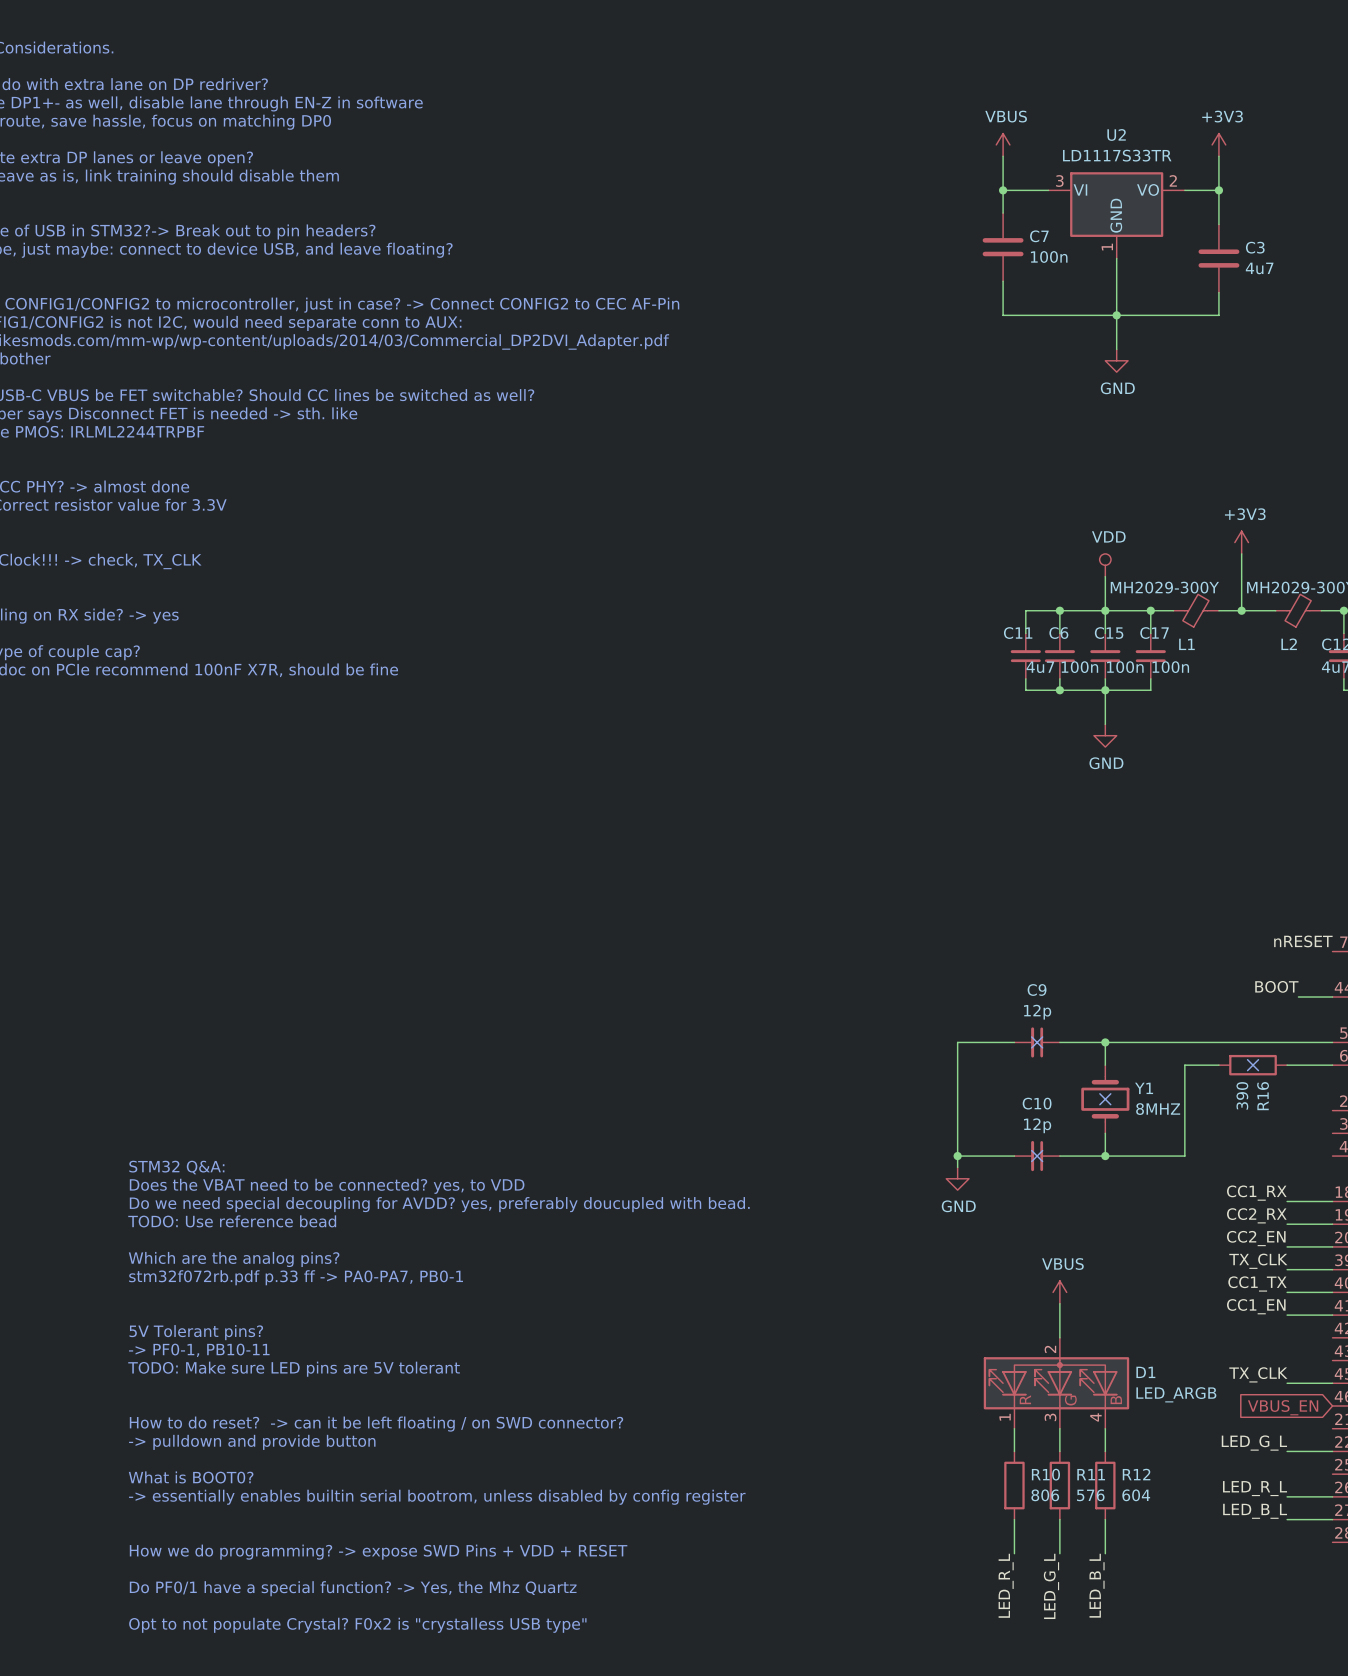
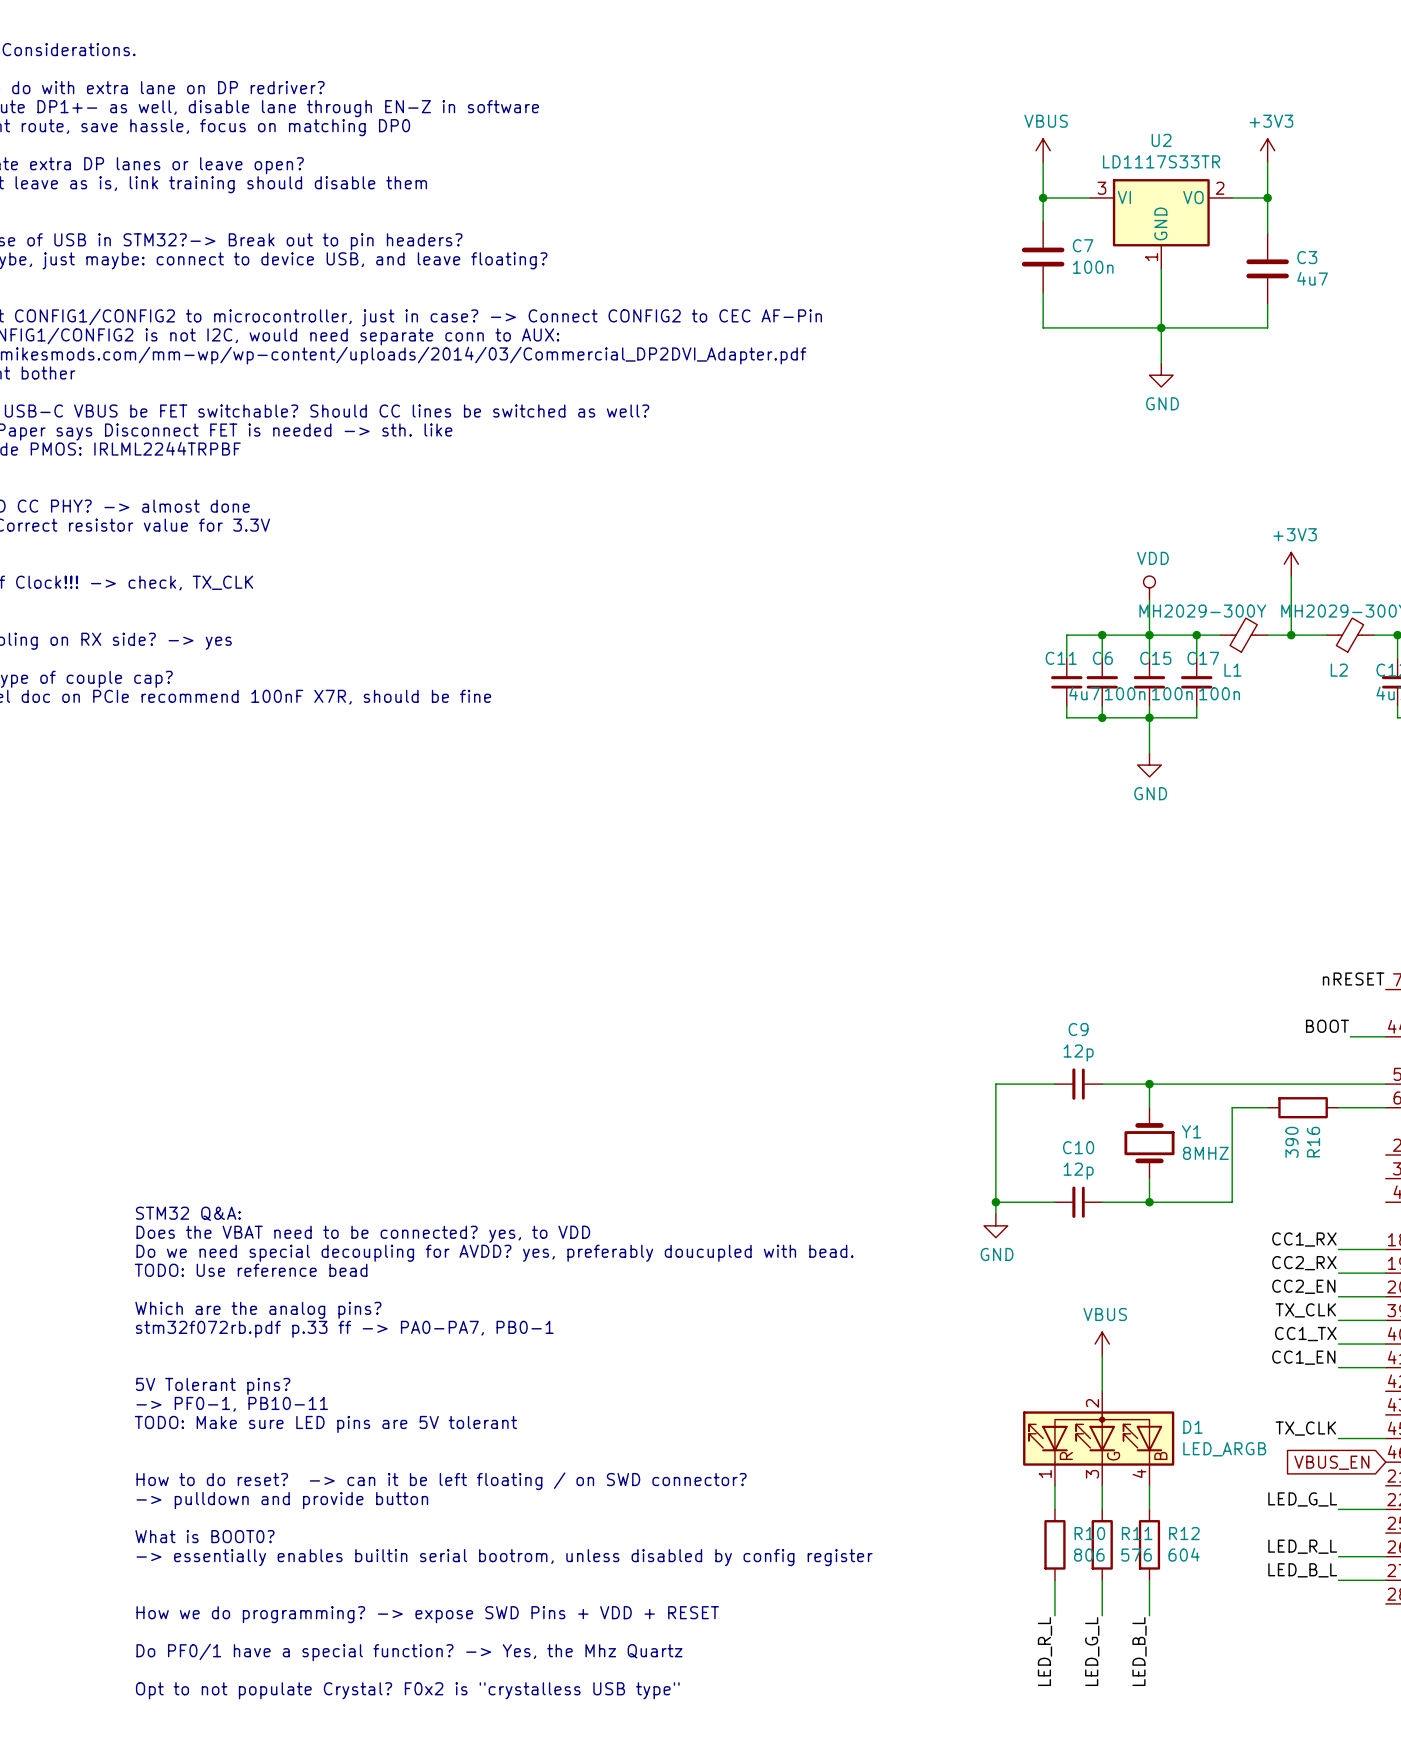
no-connect mark: (1037, 1042) -> none
no-connect mark: (1253, 1065) -> none
no-connect mark: (1105, 1099) -> none
no-connect mark: (1037, 1156) -> none

